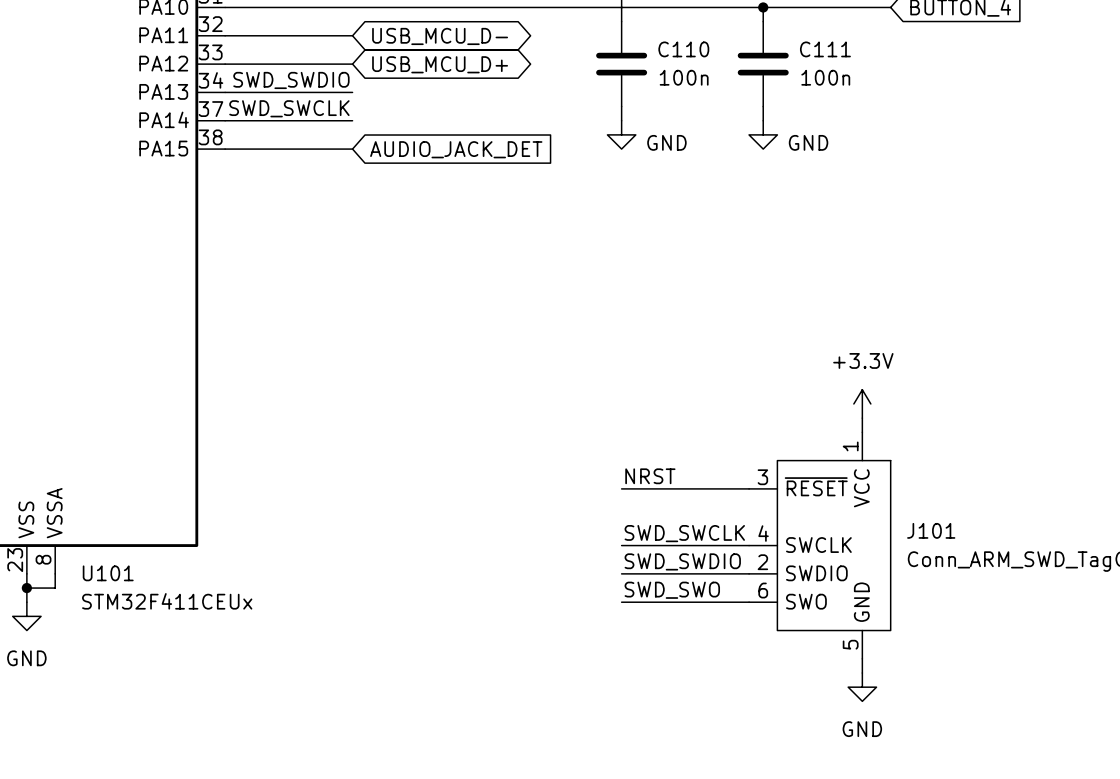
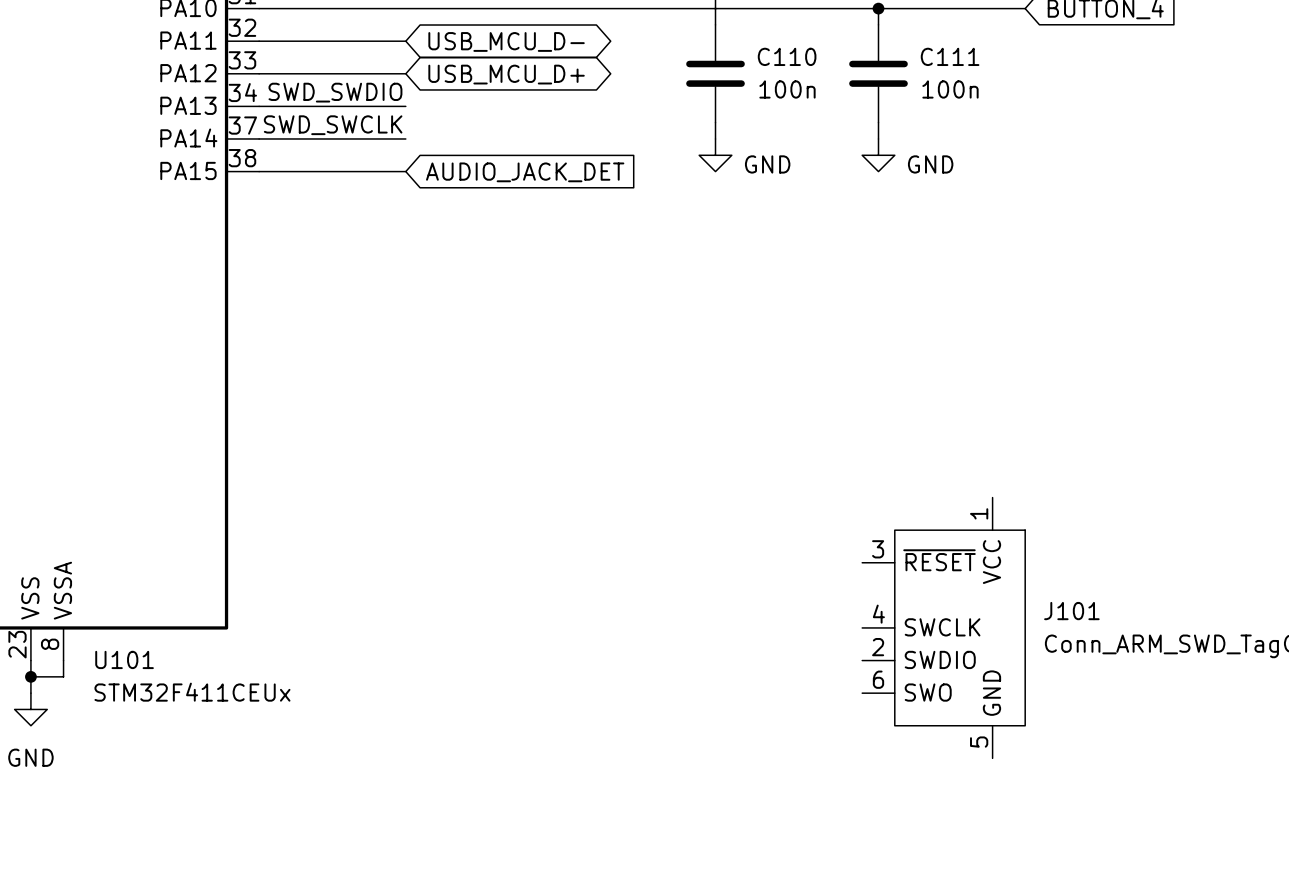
power symbol: +3.3V (862, 403) -> none
wire: (862, 418) (862, 432) -> none
label: NRST (650, 476) -> none
wire: (621, 488) (749, 488) -> none
label: SWD_SWCLK (684, 533) -> none
wire: (621, 545) (749, 545) -> none
label: SWD_SWDIO (682, 561) -> none
wire: (621, 573) (749, 573) -> none
label: SWD_SWO (672, 590) -> none
wire: (621, 602) (749, 602) -> none
wire: (862, 658) (862, 673) -> none
power symbol: GND (862, 687) -> none

